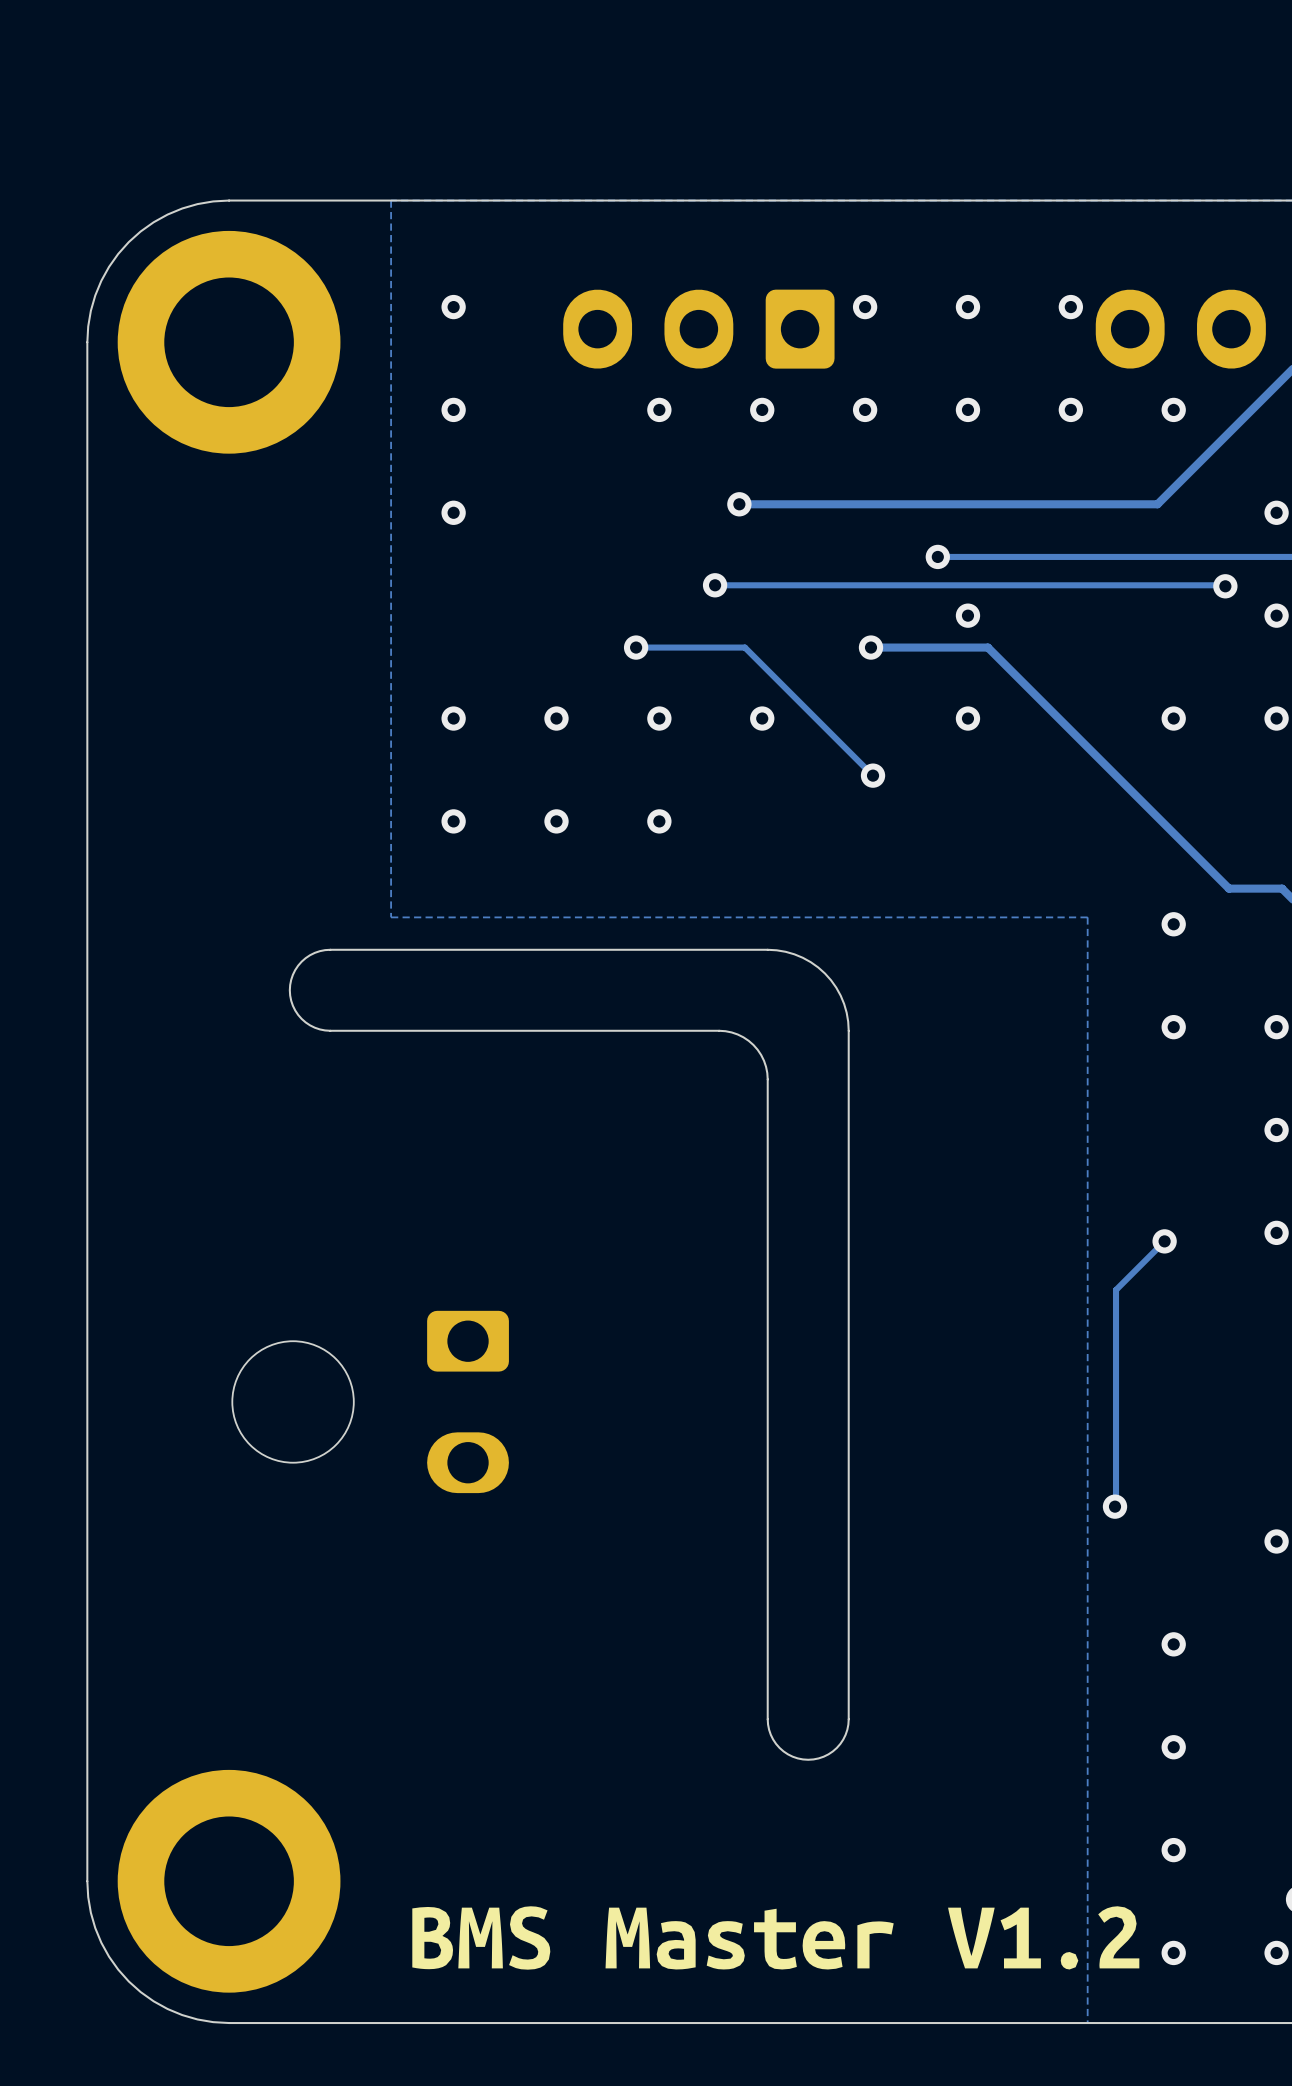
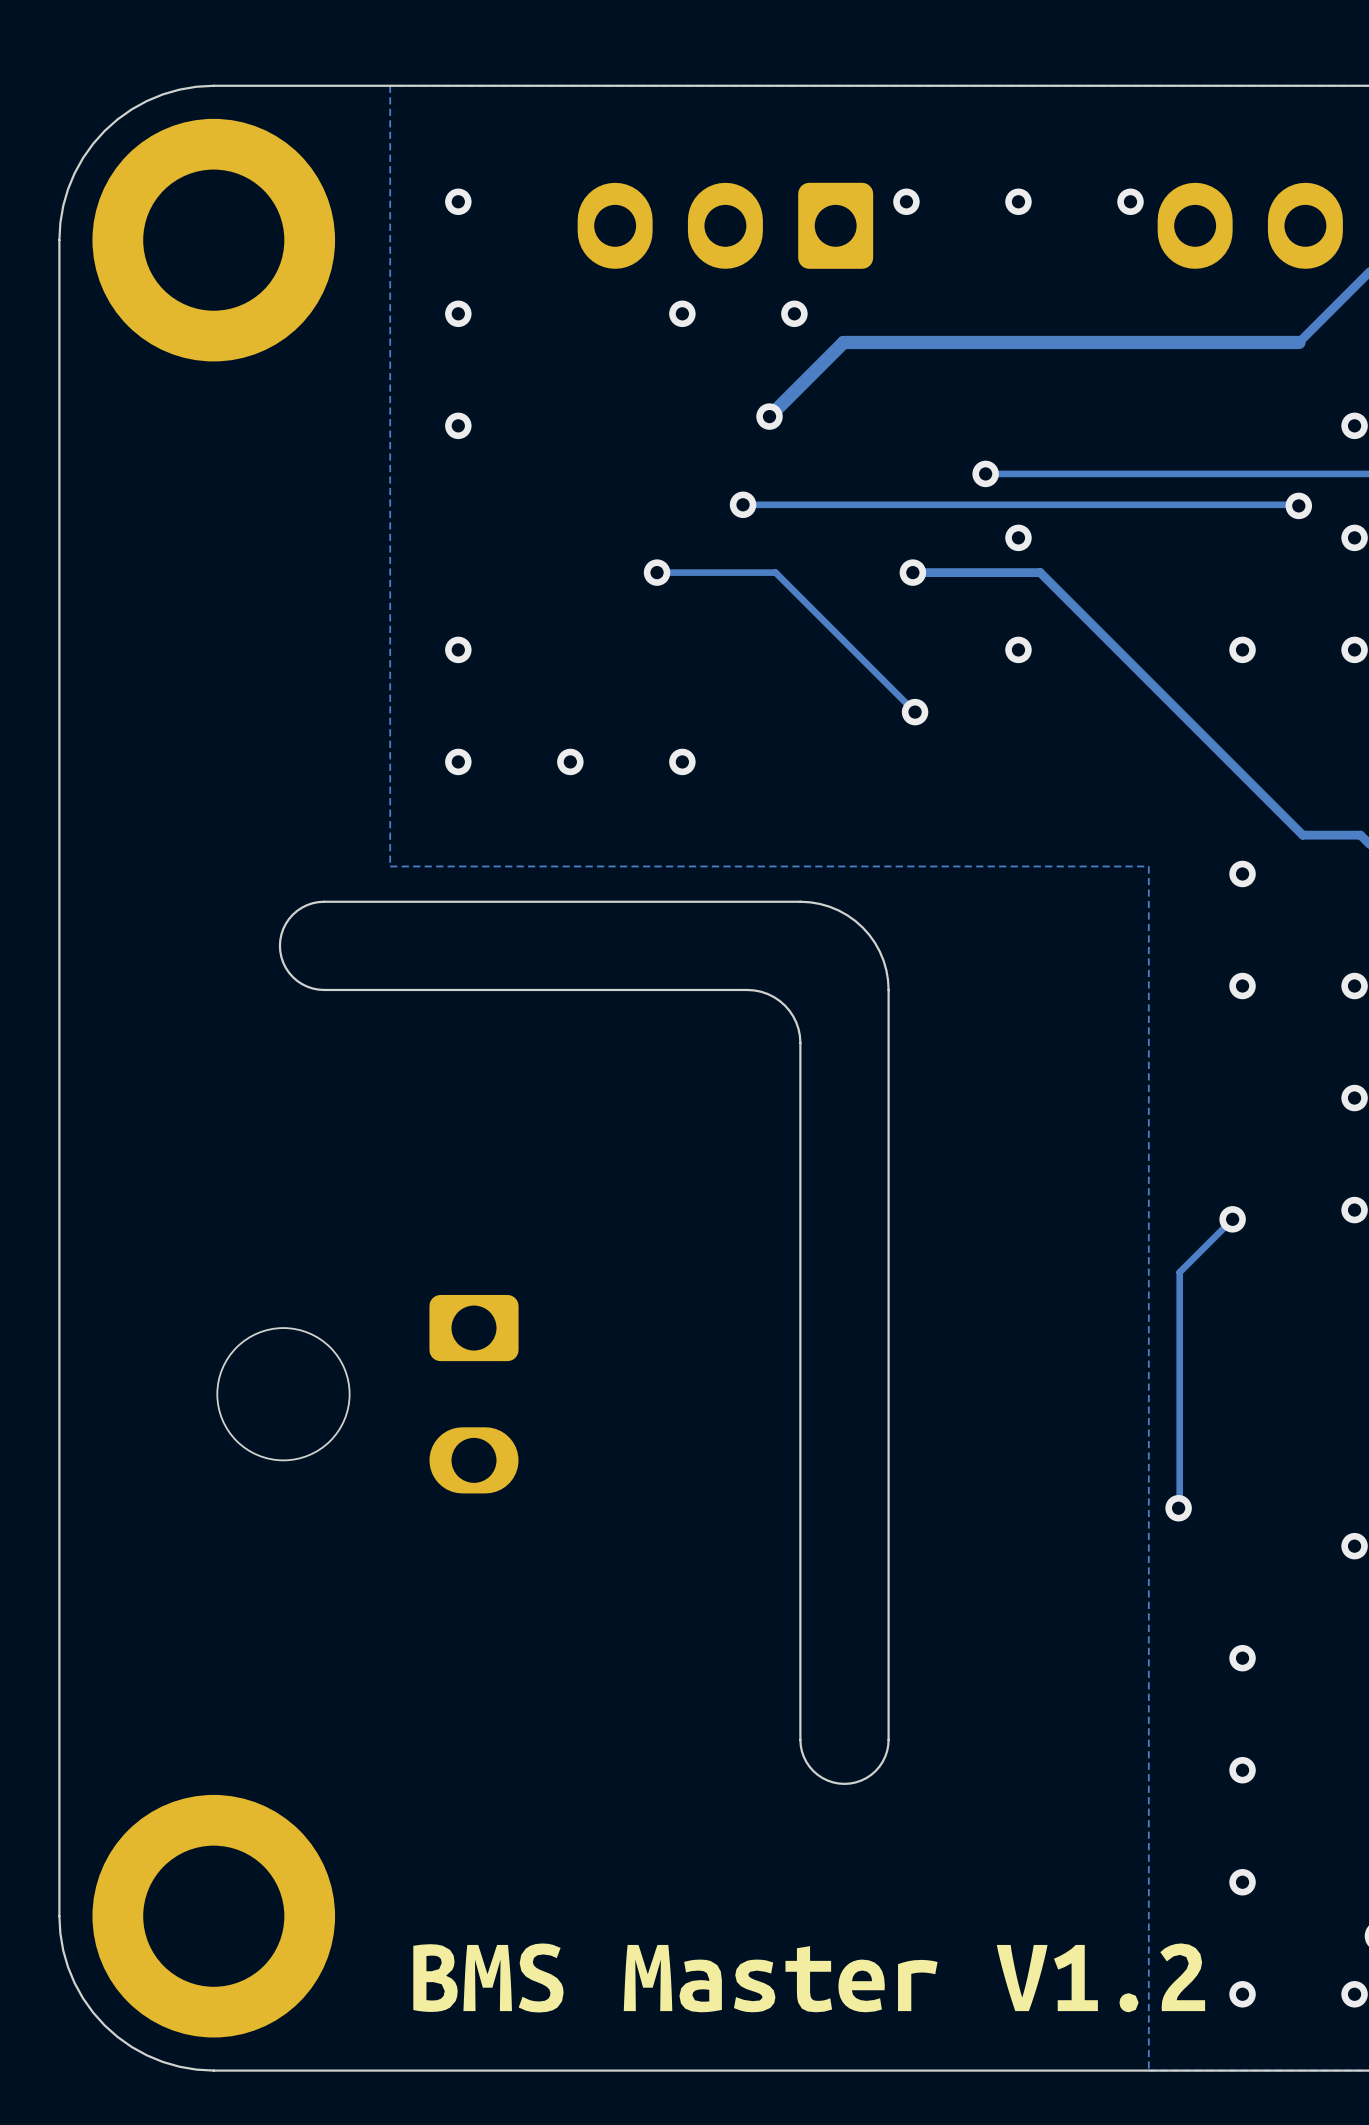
via: (865, 409) -> none
via: (967, 409) -> none
via: (1070, 409) -> none
via: (1173, 409) -> none
track: (1225, 436) (1157, 504) (739, 504) -> (1299, 342) (843, 342) (769, 416)
via: (556, 718) -> none
via: (659, 718) -> none
via: (762, 718) -> none

